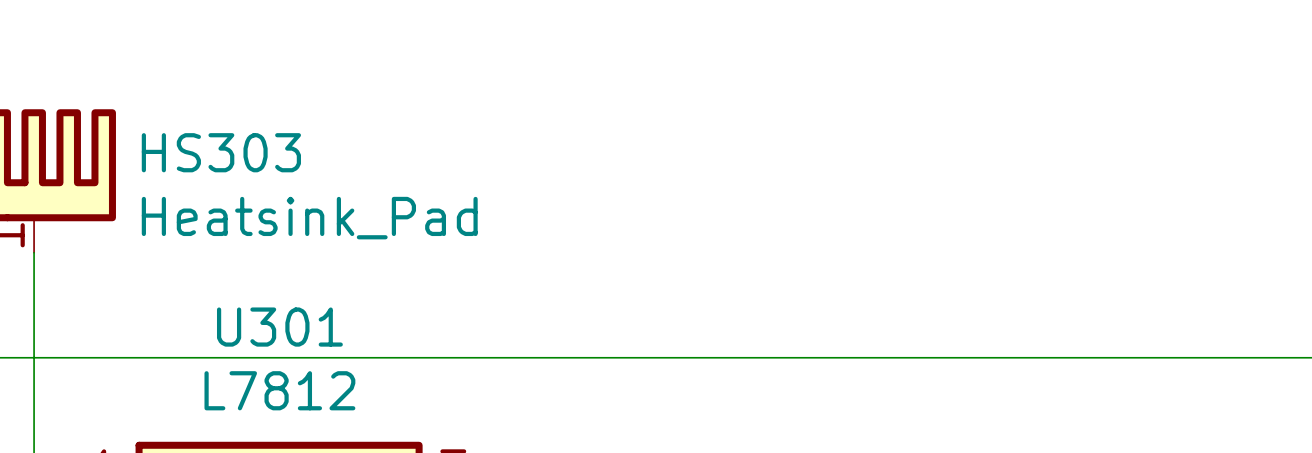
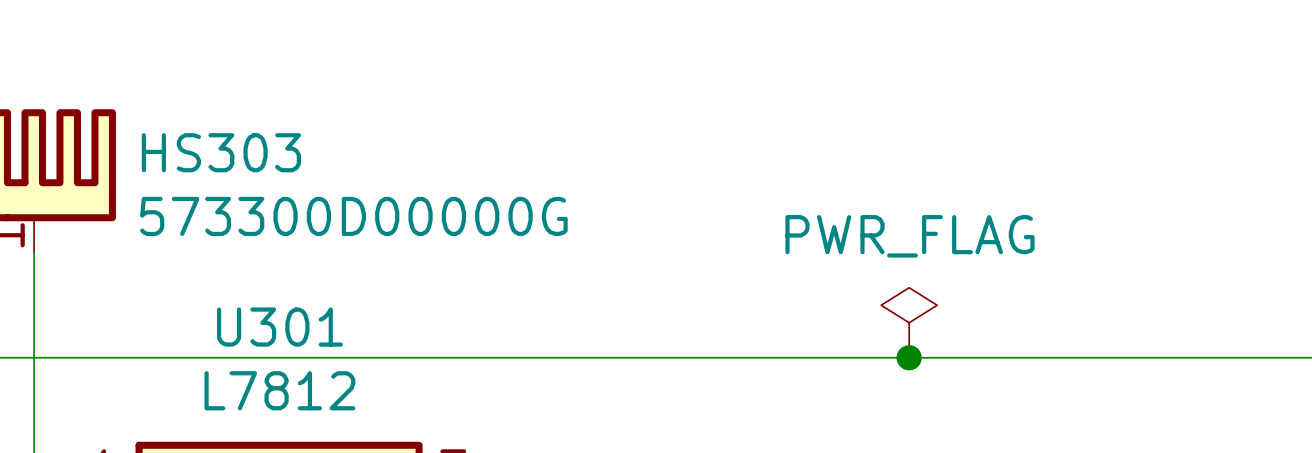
HS303 value: Heatsink_Pad (309, 218) -> 573300D00000G (353, 216)
power symbol: none -> PWR_FLAG (909, 322)
junction: none -> (909, 357)

